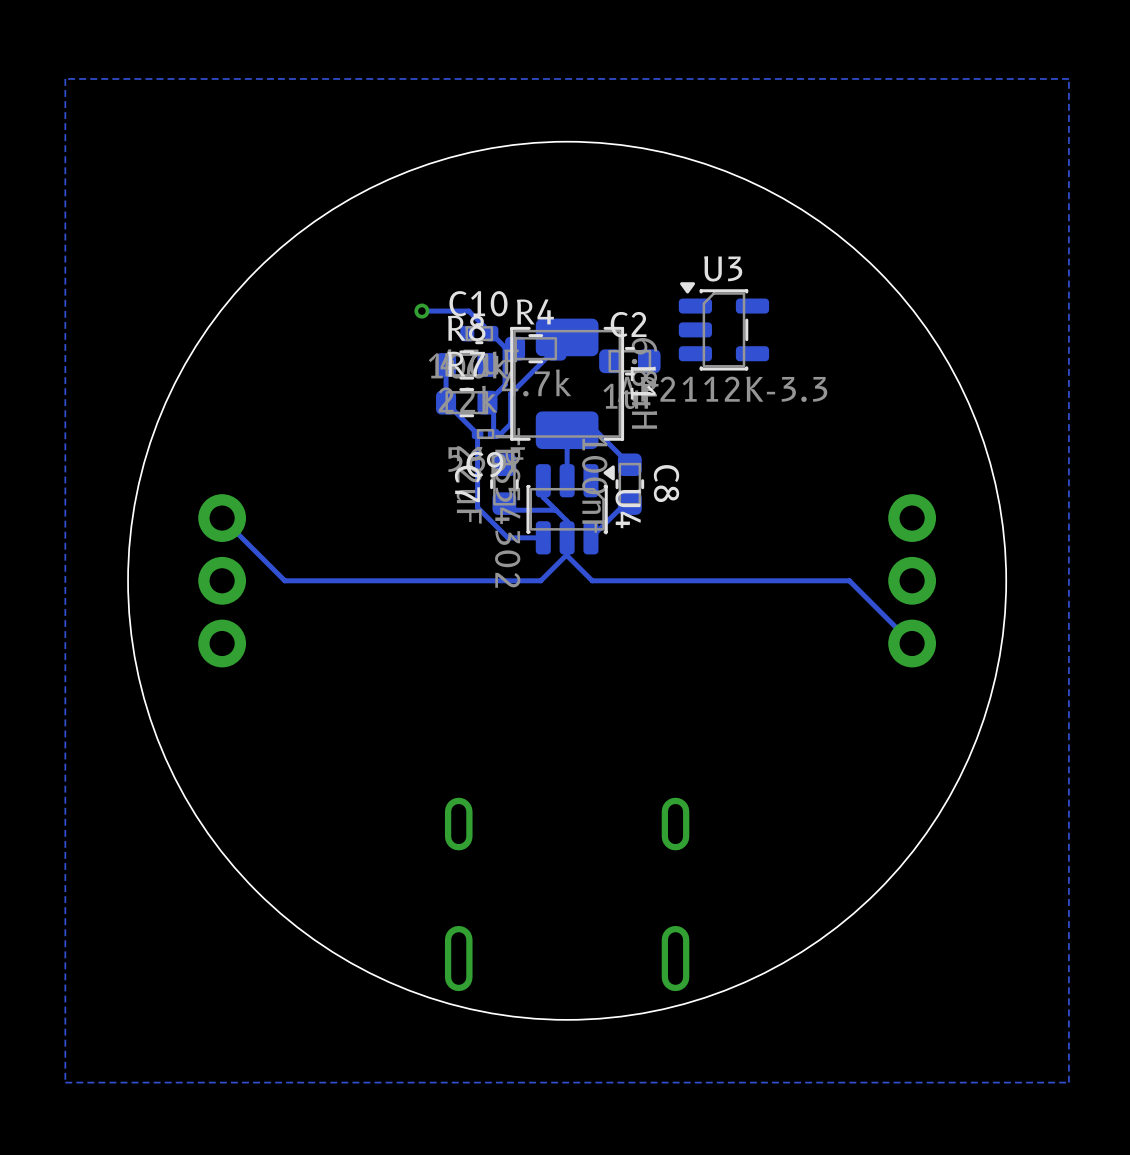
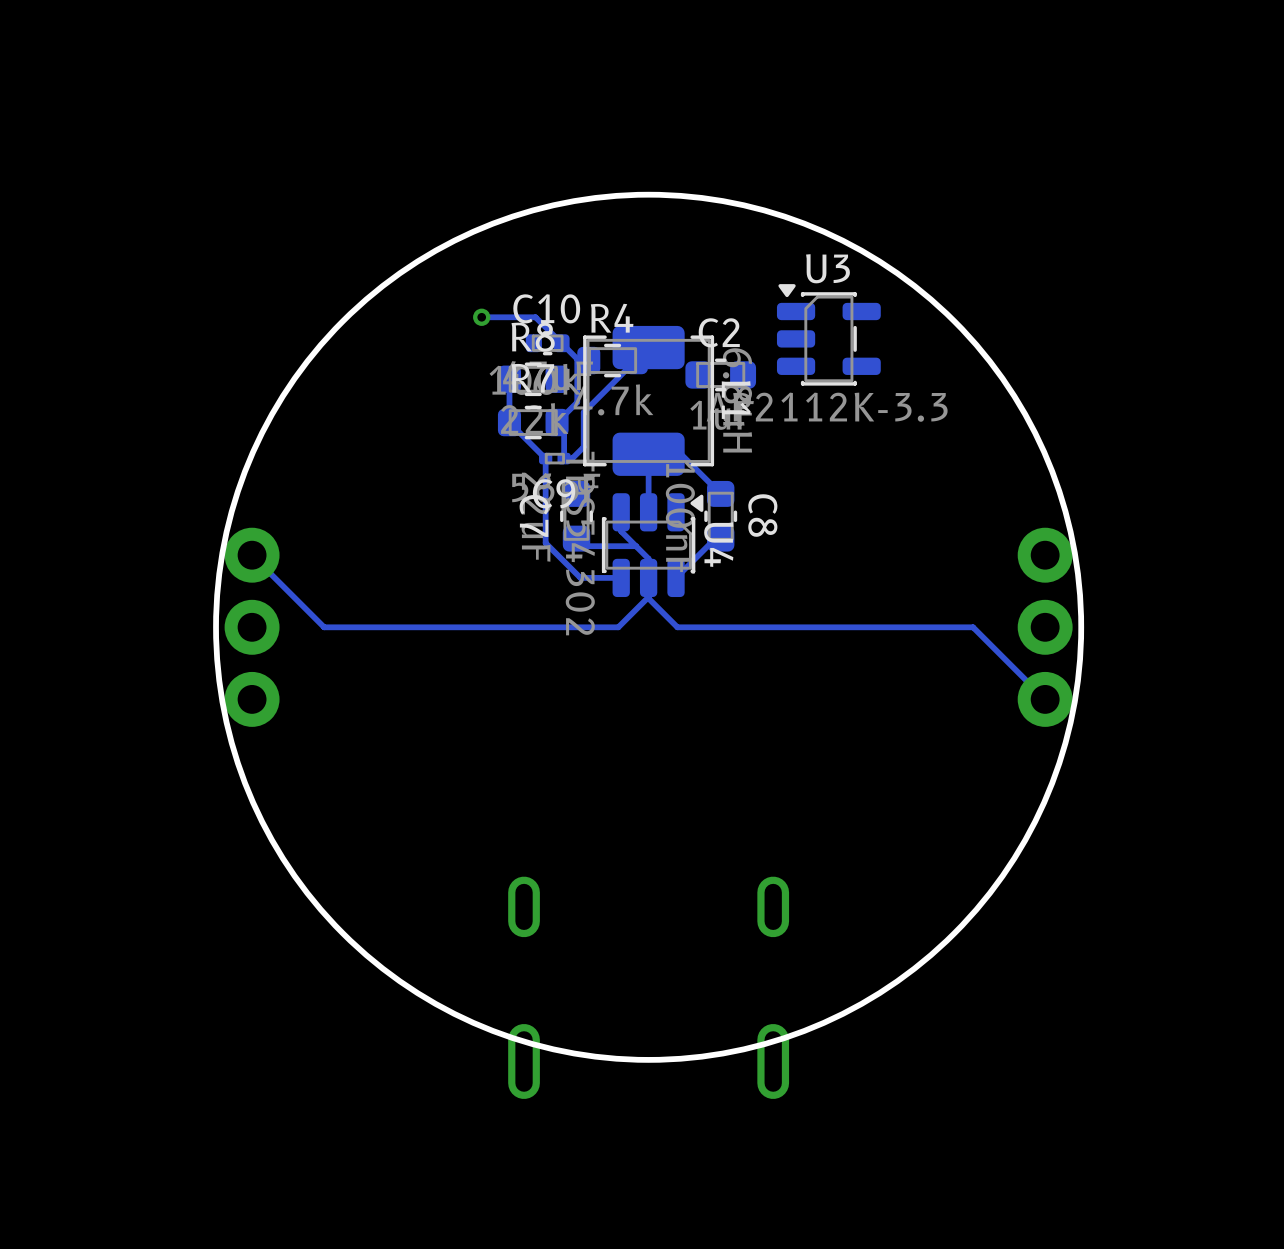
zone outline: (1068, 78) (65, 78) (65, 1082) (1068, 1082) (1068, 78) -> none
round board edge size: [127, 141, 1007, 1021] -> [213, 191, 1085, 1063]

